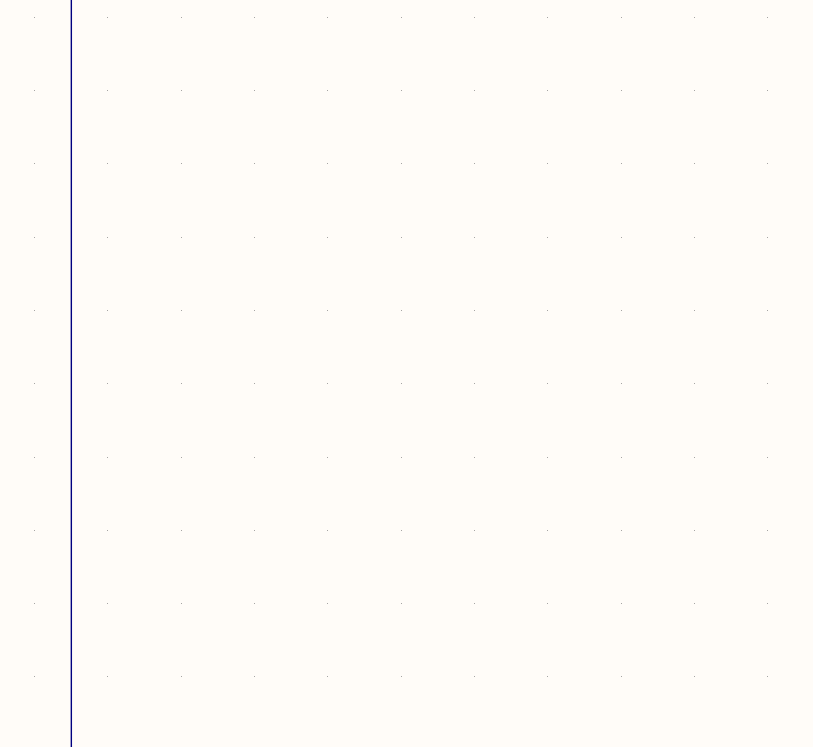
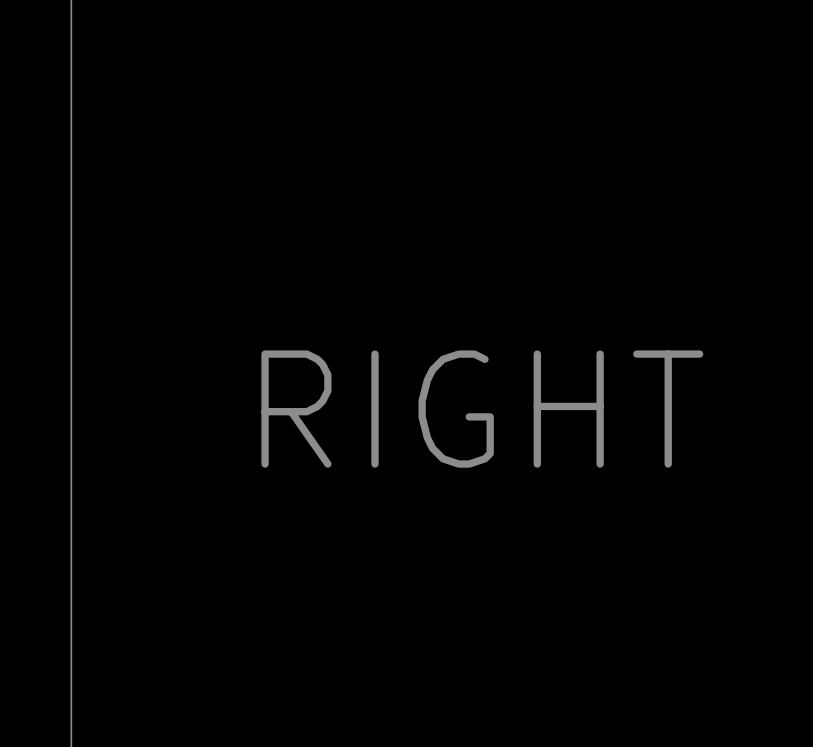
text: none -> RIGHT (482, 409)

